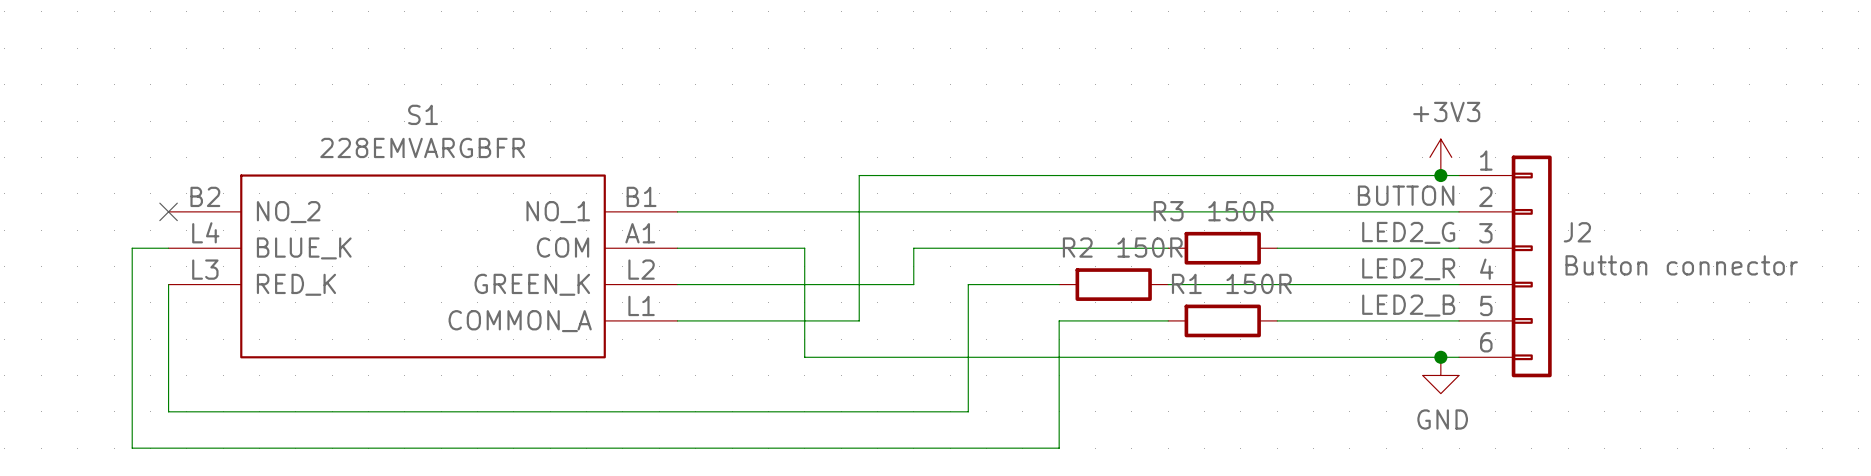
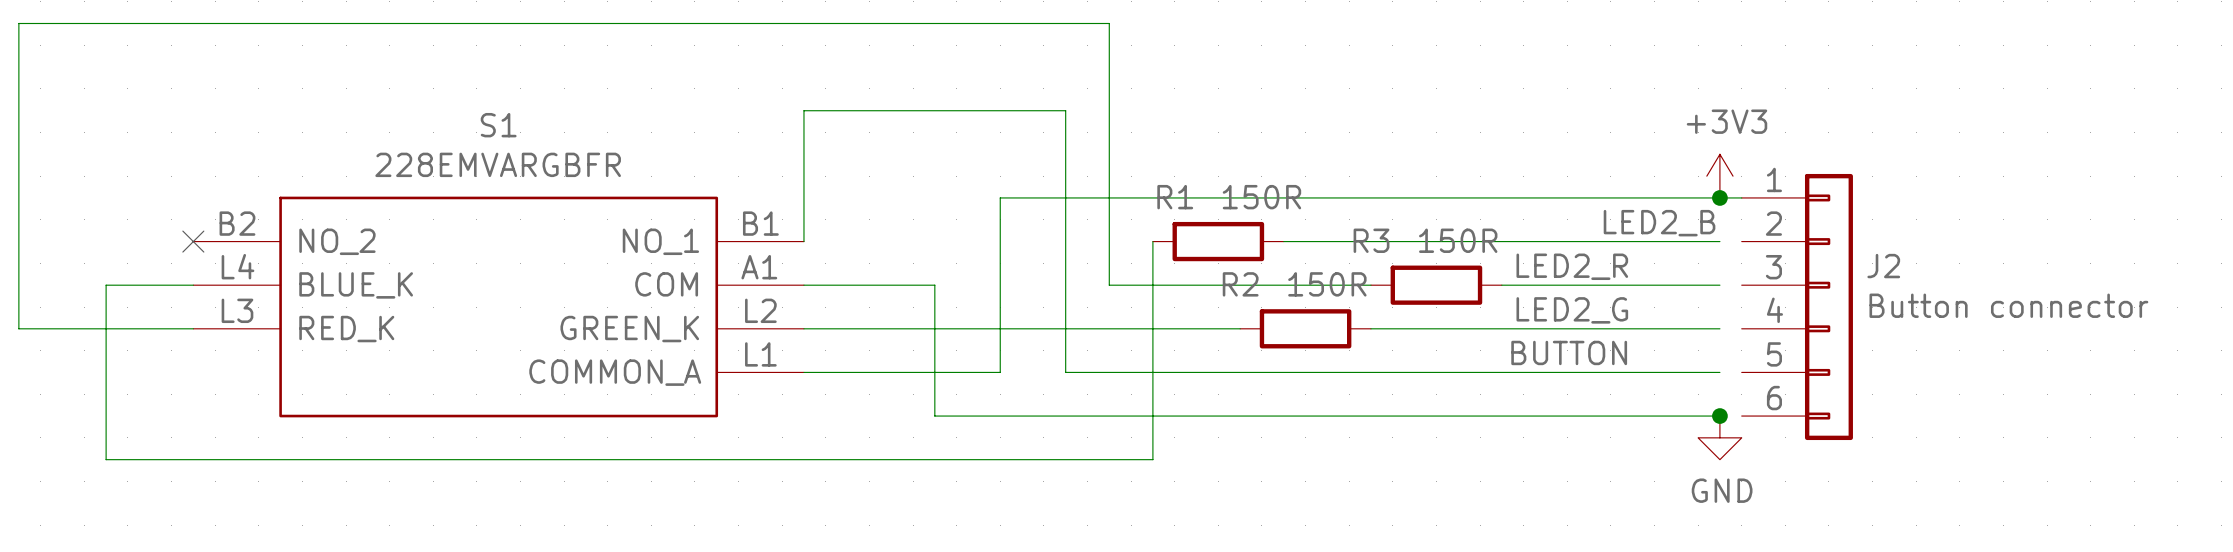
wire: (859, 175) (859, 320) (841, 320) -> (1022, 197) (1000, 197) (1000, 372)
label position: BUTTON (1406, 195) -> BUTTON (1569, 352)
wire: (677, 211) (1077, 211) -> (803, 241) (803, 110) (1065, 110) (1065, 372) (1261, 372)
wire: (1440, 211) (1459, 211) -> none
label position: LED2_G (1408, 232) -> LED2_G (1572, 310)
R2 name position: R2 (1077, 247) -> R2 (1240, 284)
R2 value position: 150R (1150, 247) -> 150R (1327, 284)
wire: (132, 248) (132, 448) (1059, 448) (1059, 320) -> none
wire: (786, 248) (804, 248) (804, 357) -> (934, 285) (934, 416) (956, 416)
wire: (931, 248) (913, 248) (913, 284) -> (1152, 241) (1152, 328) (1087, 328)
wire: none -> (1109, 285) (1109, 23) (18, 23) (18, 328) (193, 328)
R3 position: (1222, 248) -> (1436, 285)
wire: (1440, 248) (1459, 248) -> none
label position: LED2_R (1408, 269) -> LED2_R (1572, 266)
wire: (168, 284) (168, 411) (968, 411) (968, 393) -> (149, 285) (106, 285) (106, 459) (1152, 459)
R2 position: (1113, 284) -> (1305, 328)
wire: (1440, 284) (1459, 284) -> none
label position: LED2_B (1408, 305) -> LED2_B (1659, 223)
wire: none -> (1392, 372) (1523, 372)
R1 position: (1222, 320) -> (1218, 241)
wire: (1440, 320) (1459, 320) -> none
wire: (1440, 357) (1459, 357) -> none

